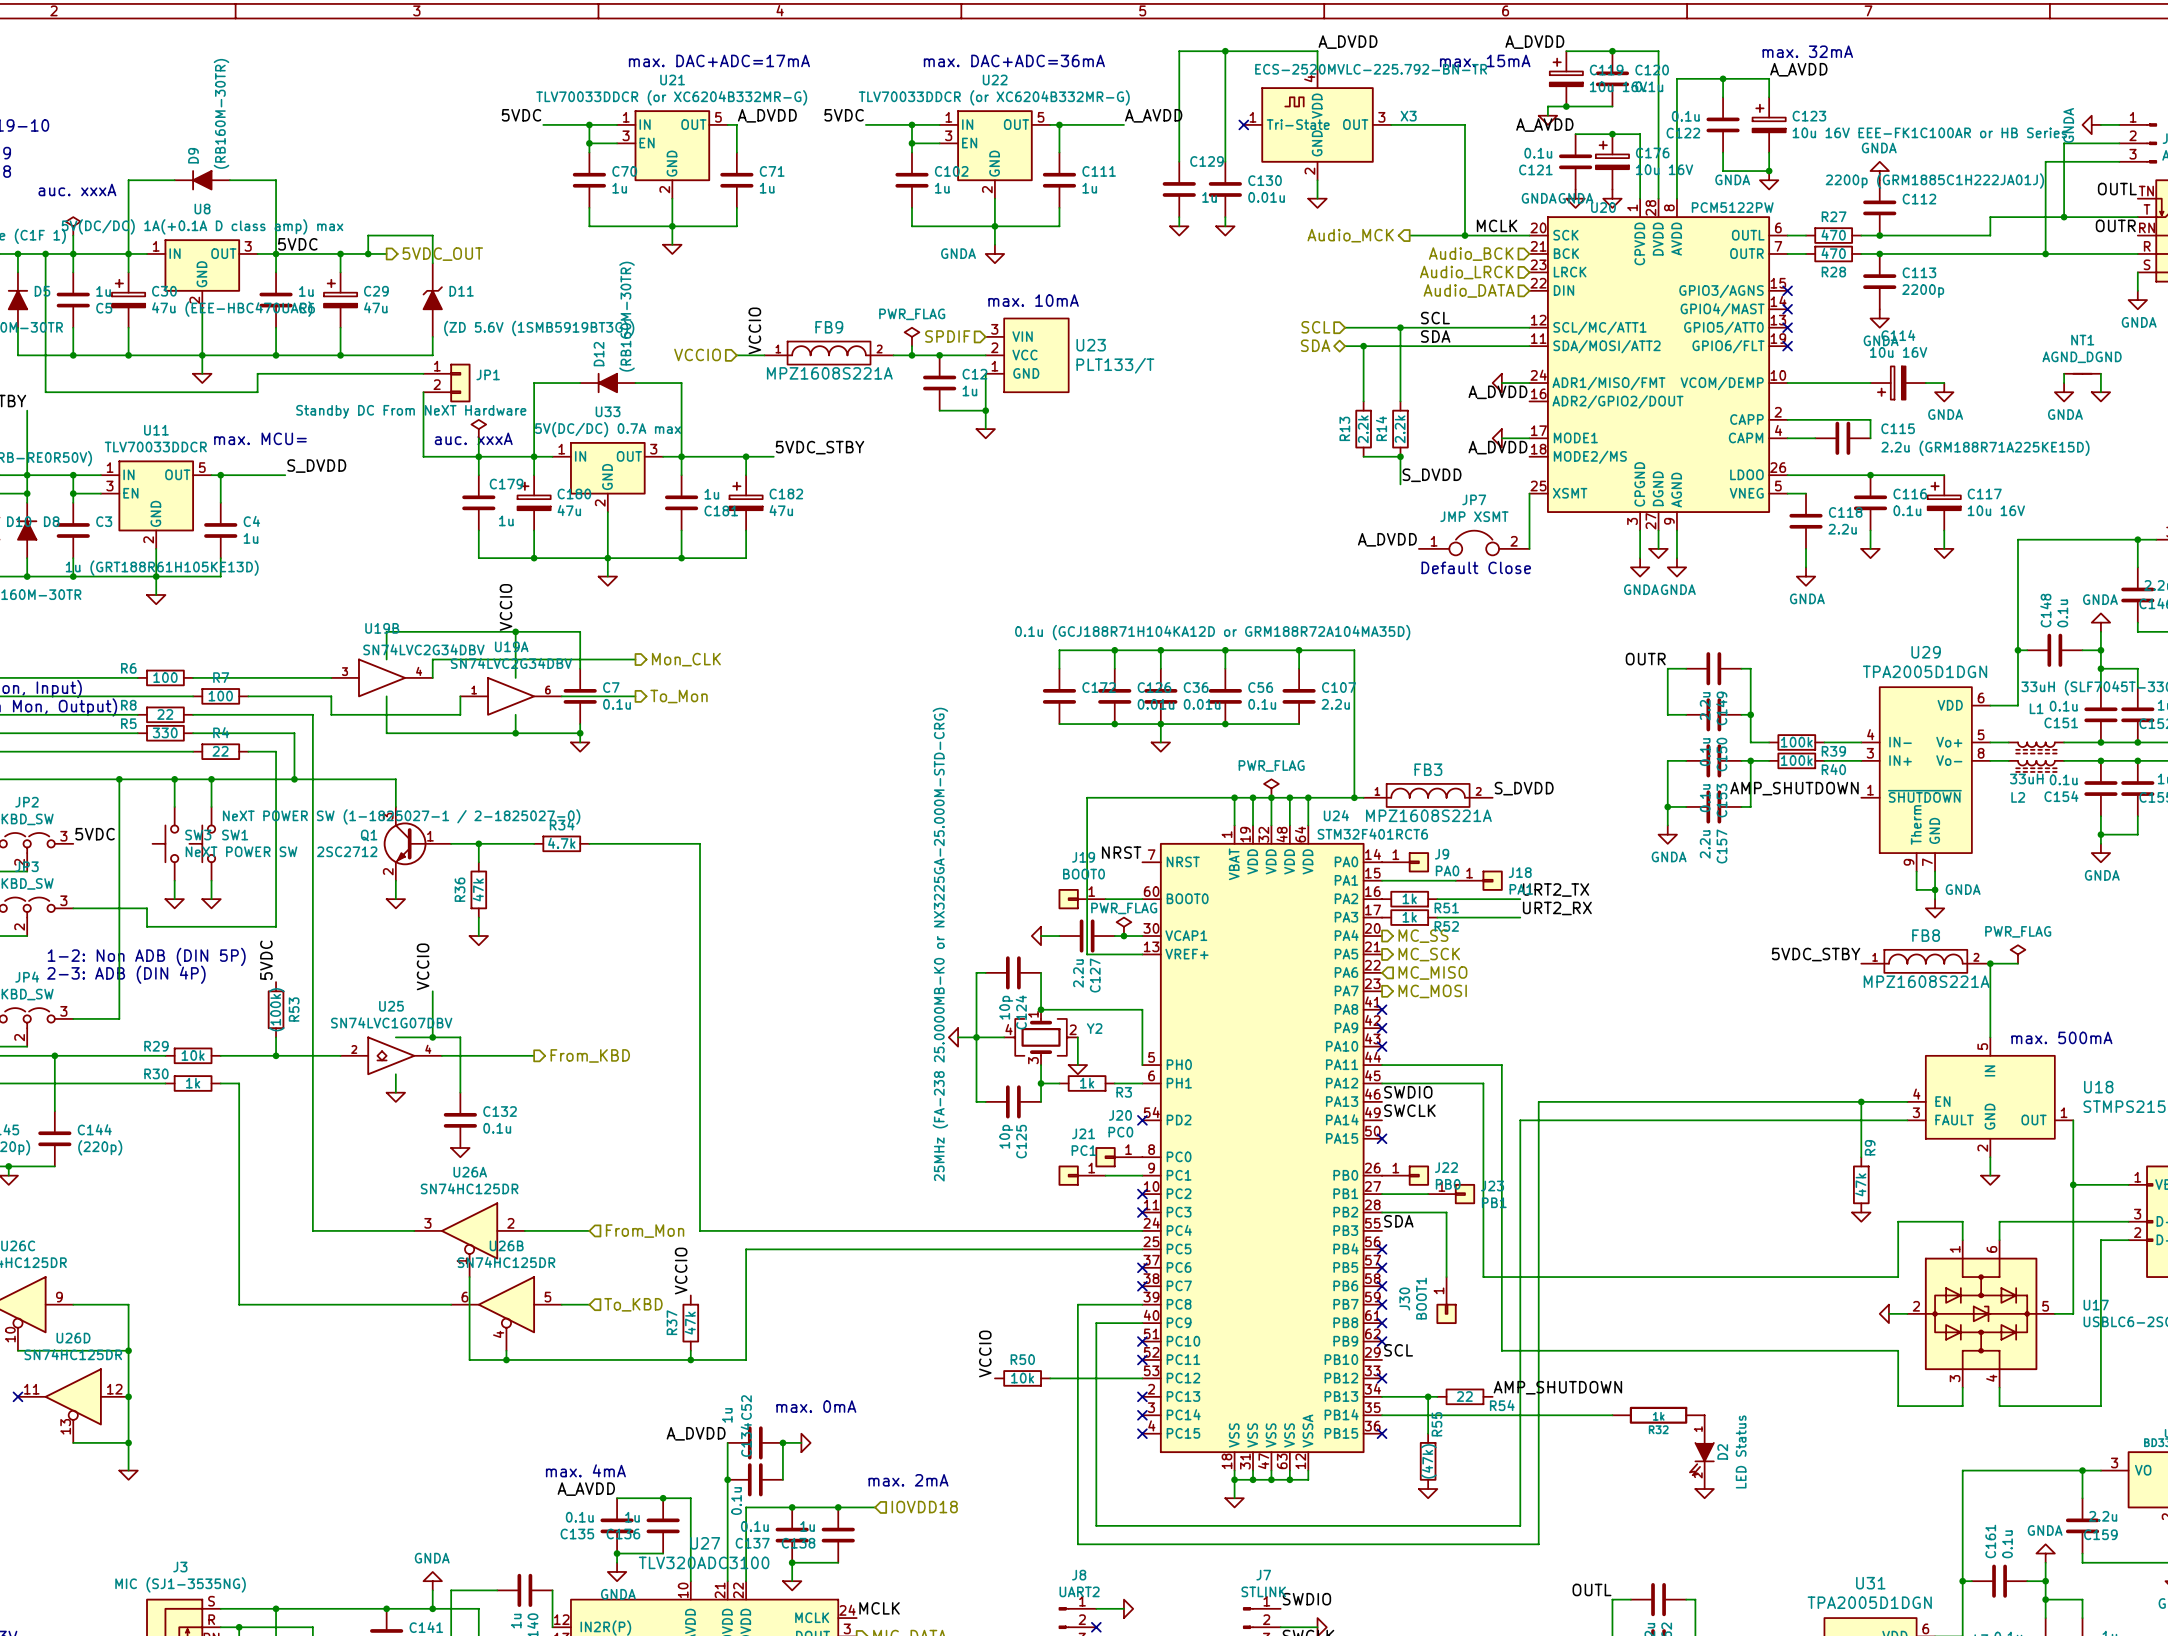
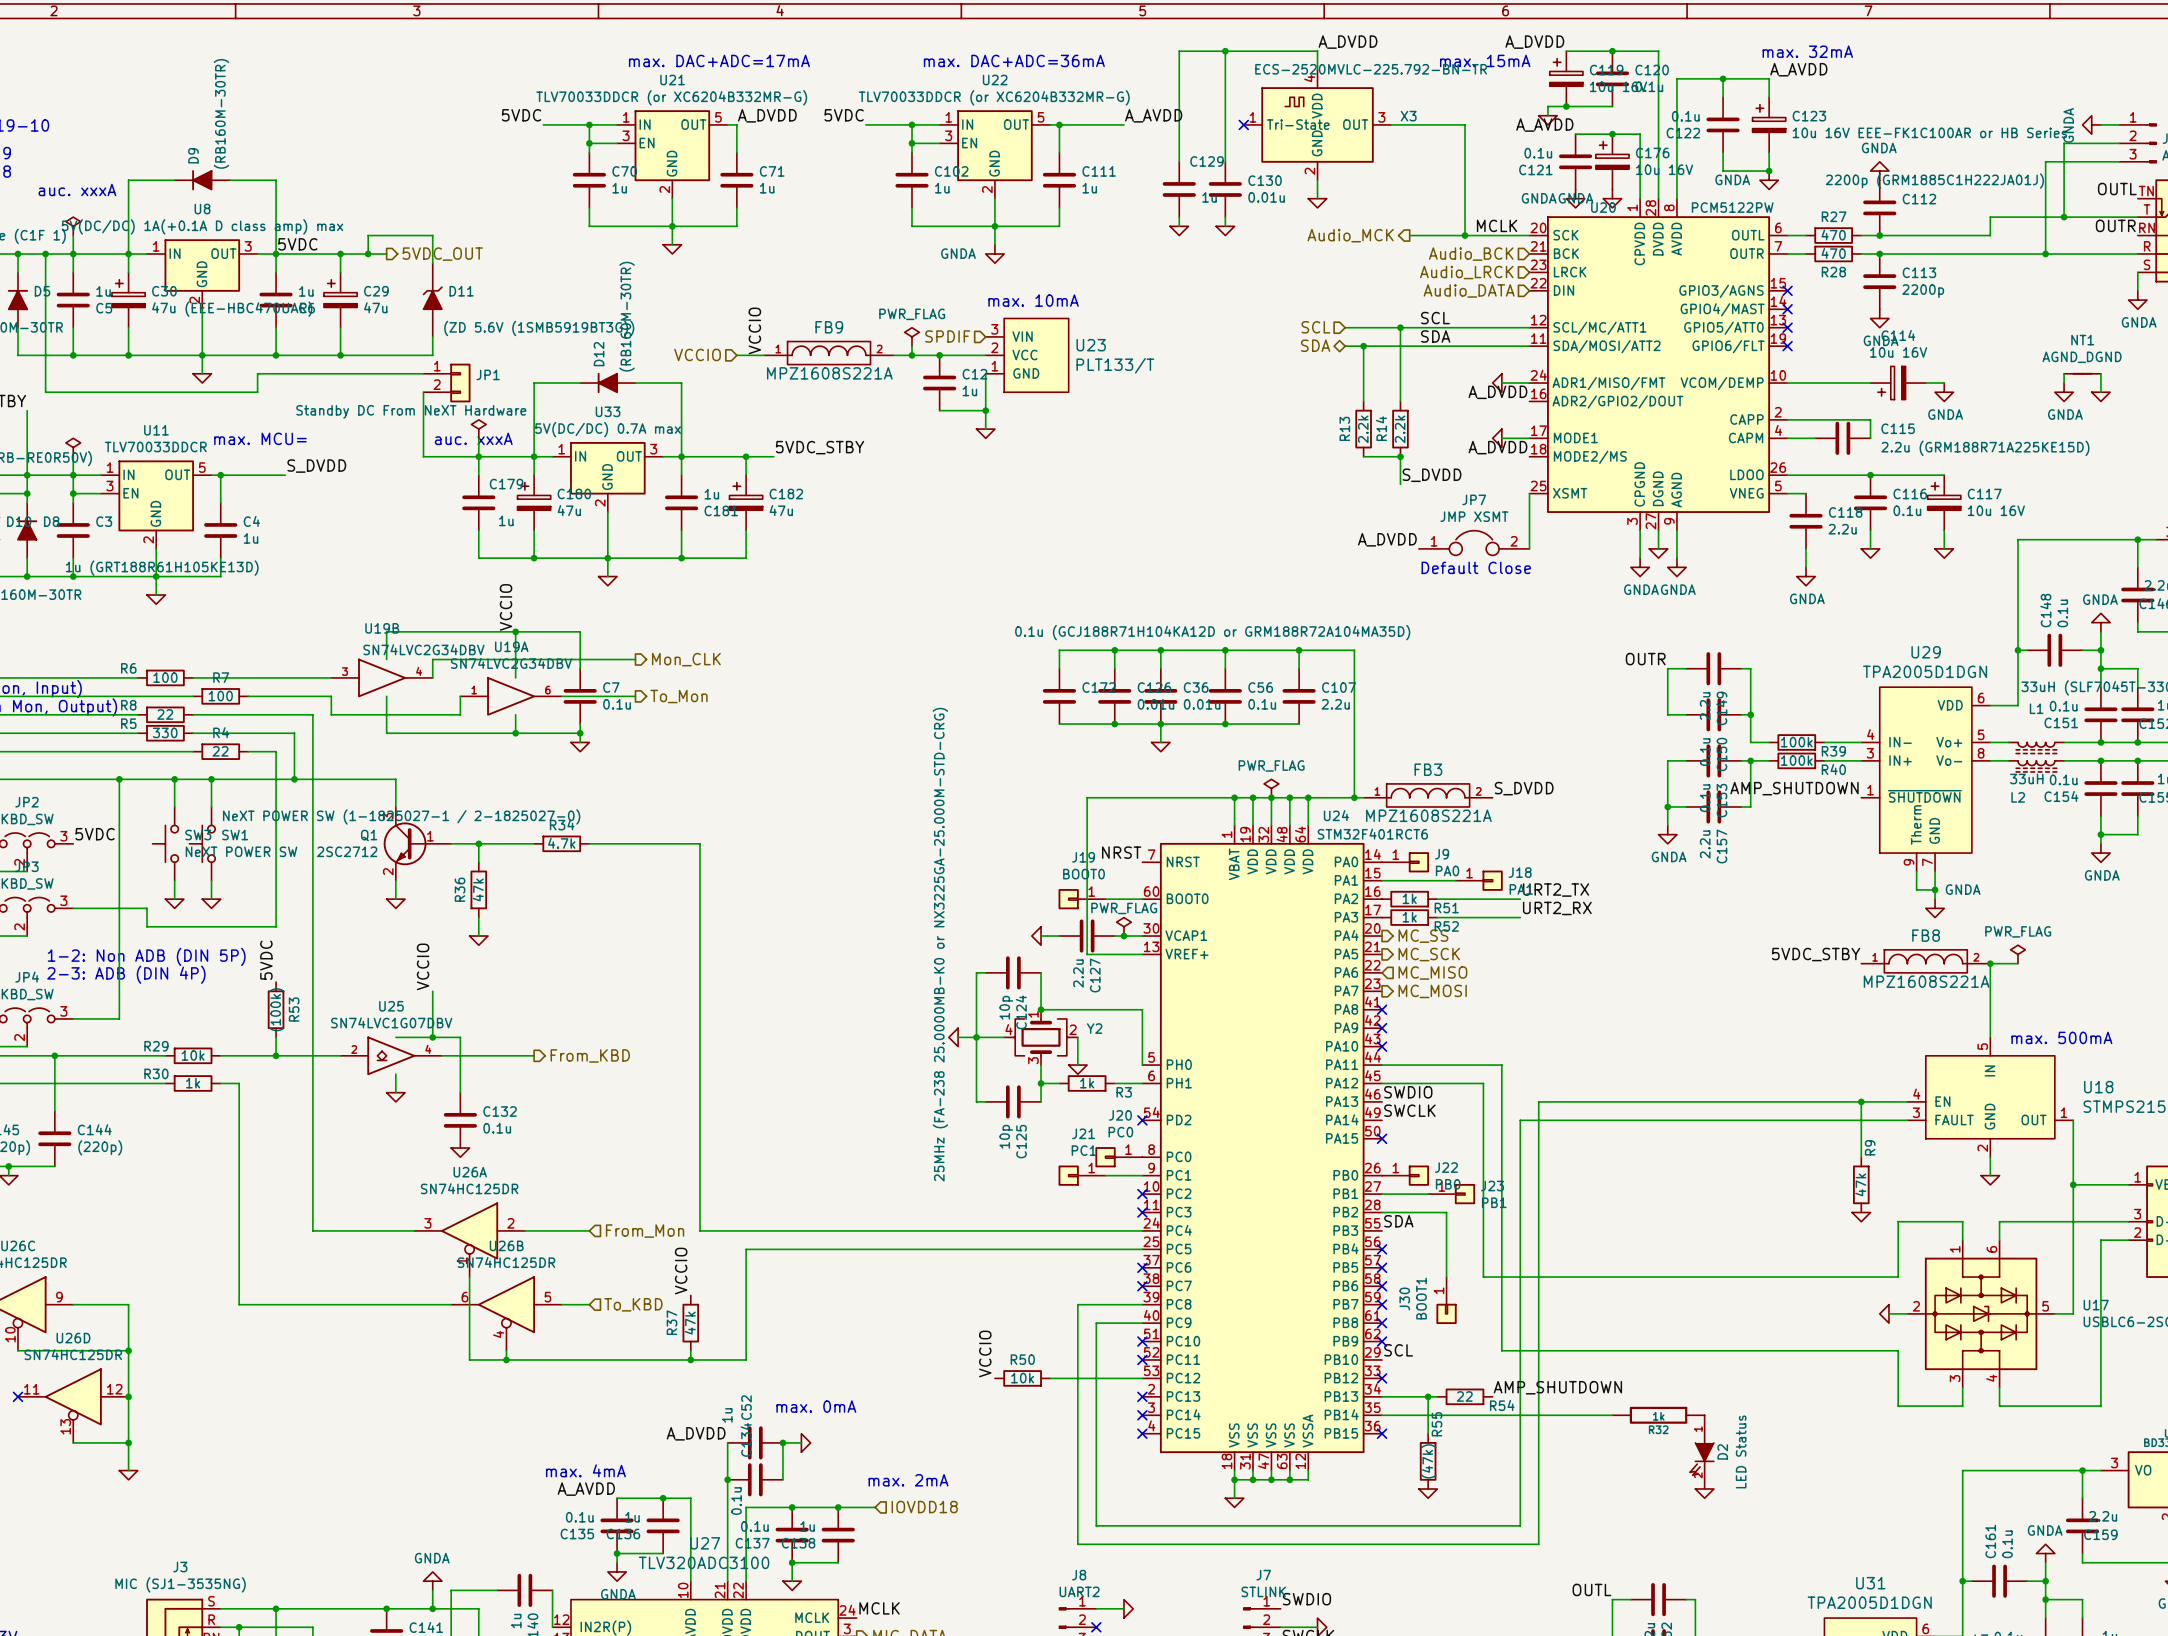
power symbol: none -> (73, 447)
wire: none -> (73, 456) (73, 475)

